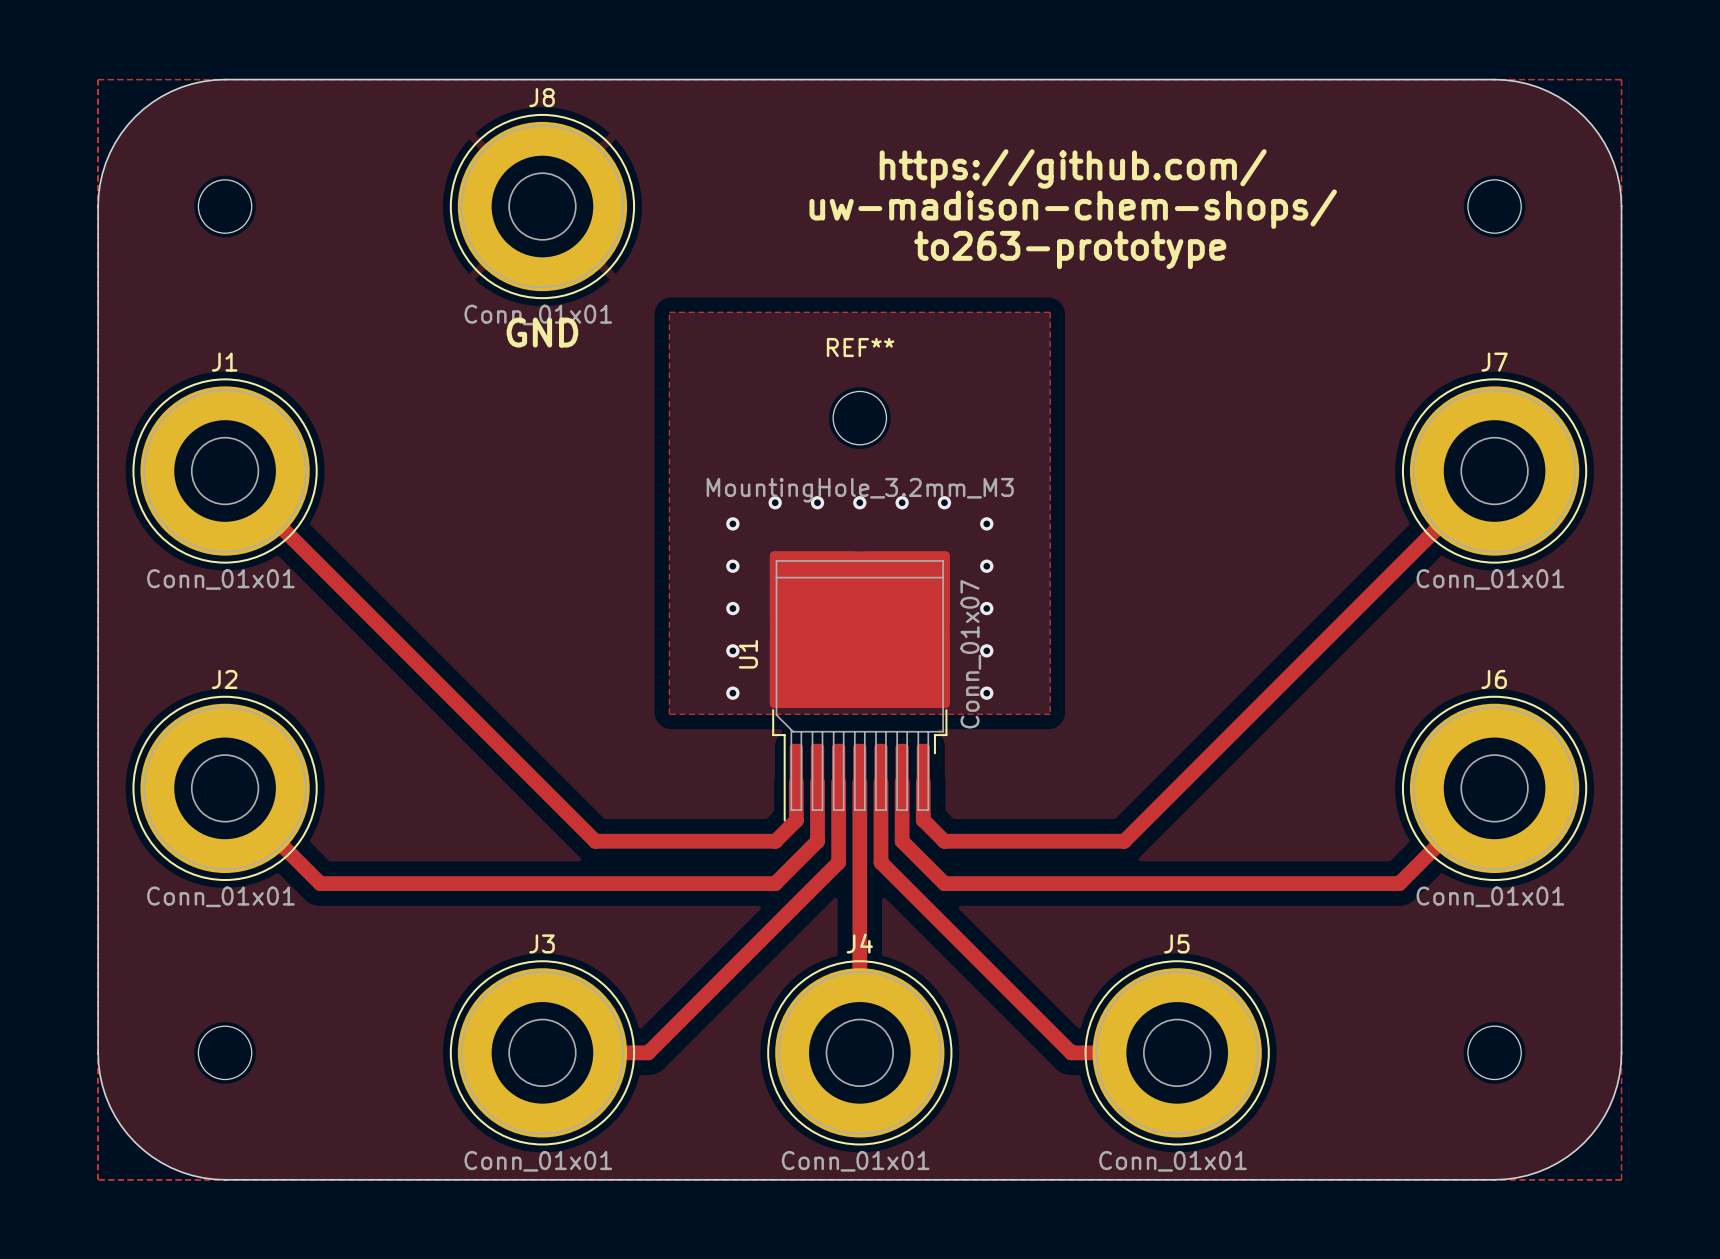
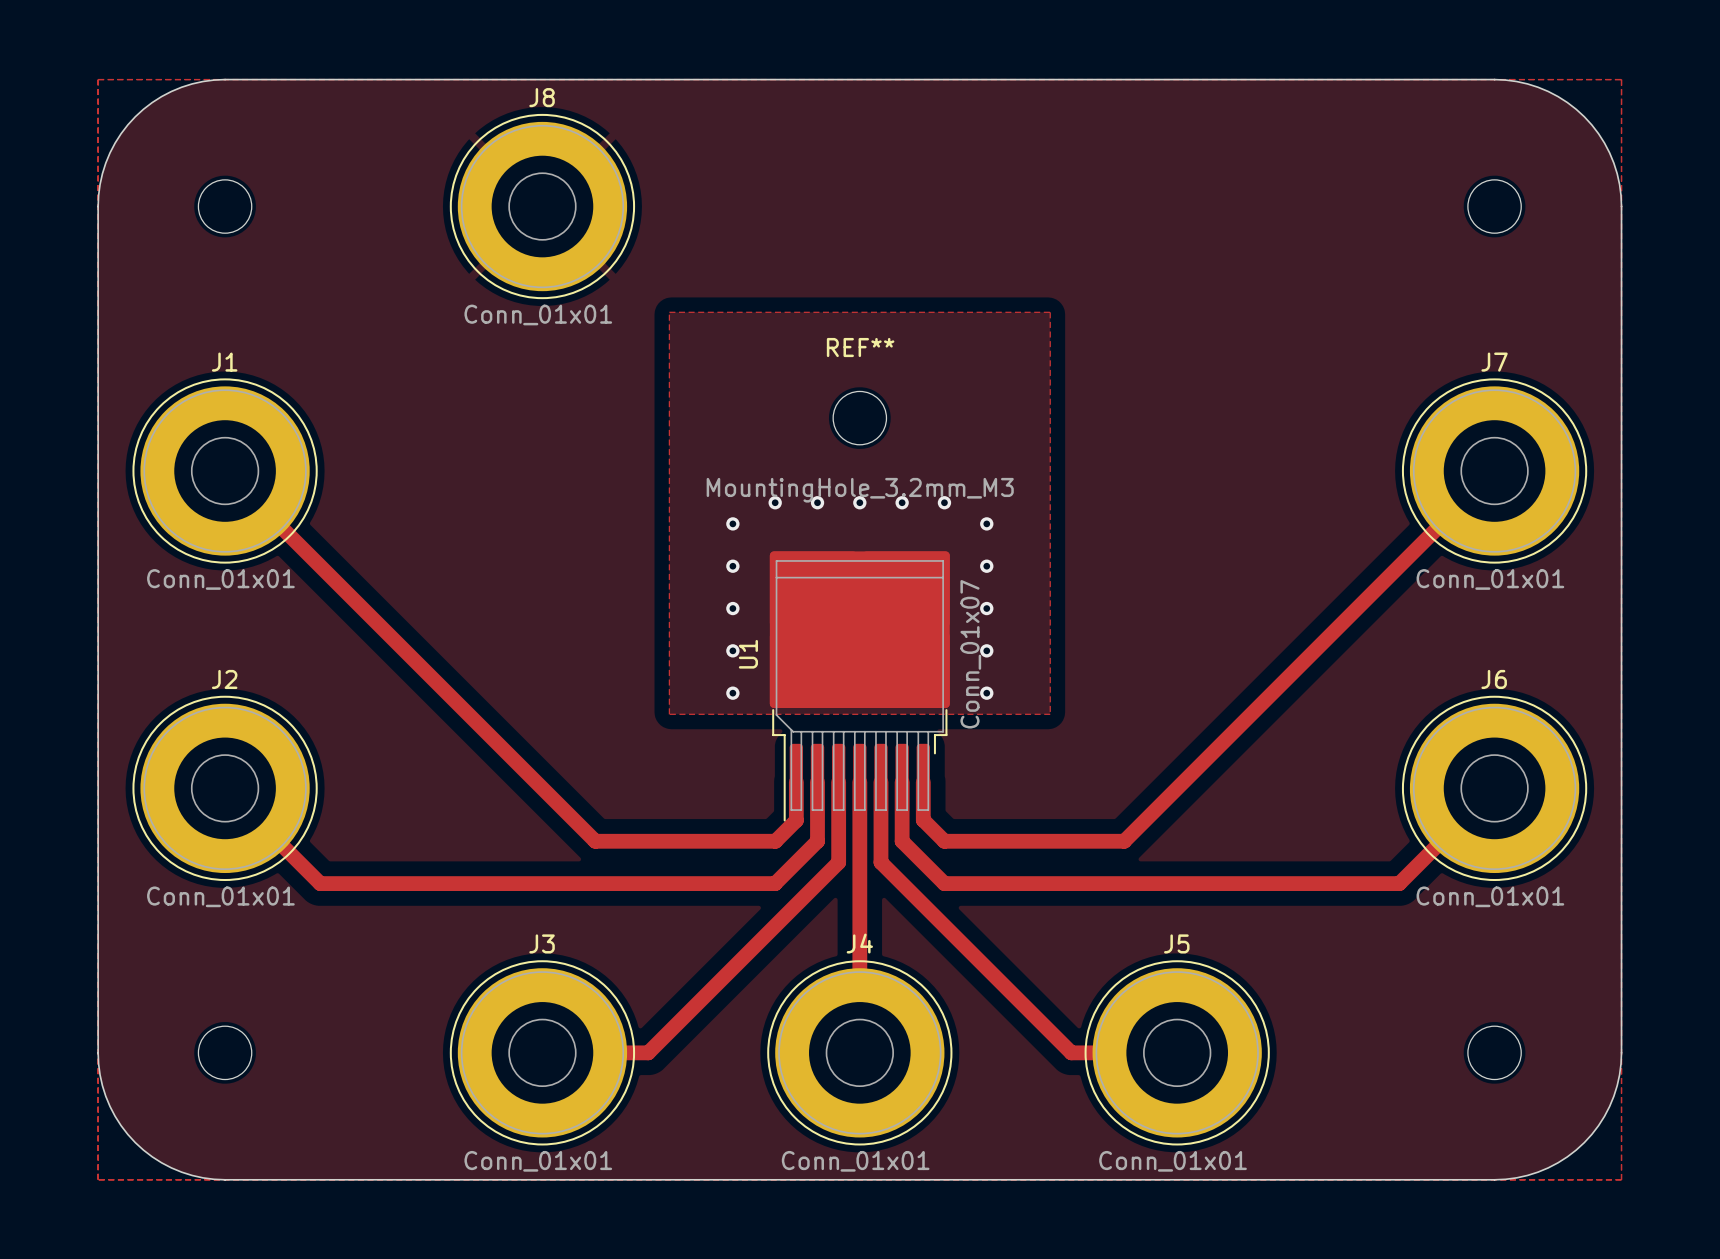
text: https://github.com/ (1073, 168) -> none
text: uw-madison-chem-shops/ (1073, 209) -> none
text: to263-prototype (1070, 249) -> none
text: GND (542, 332) -> none

